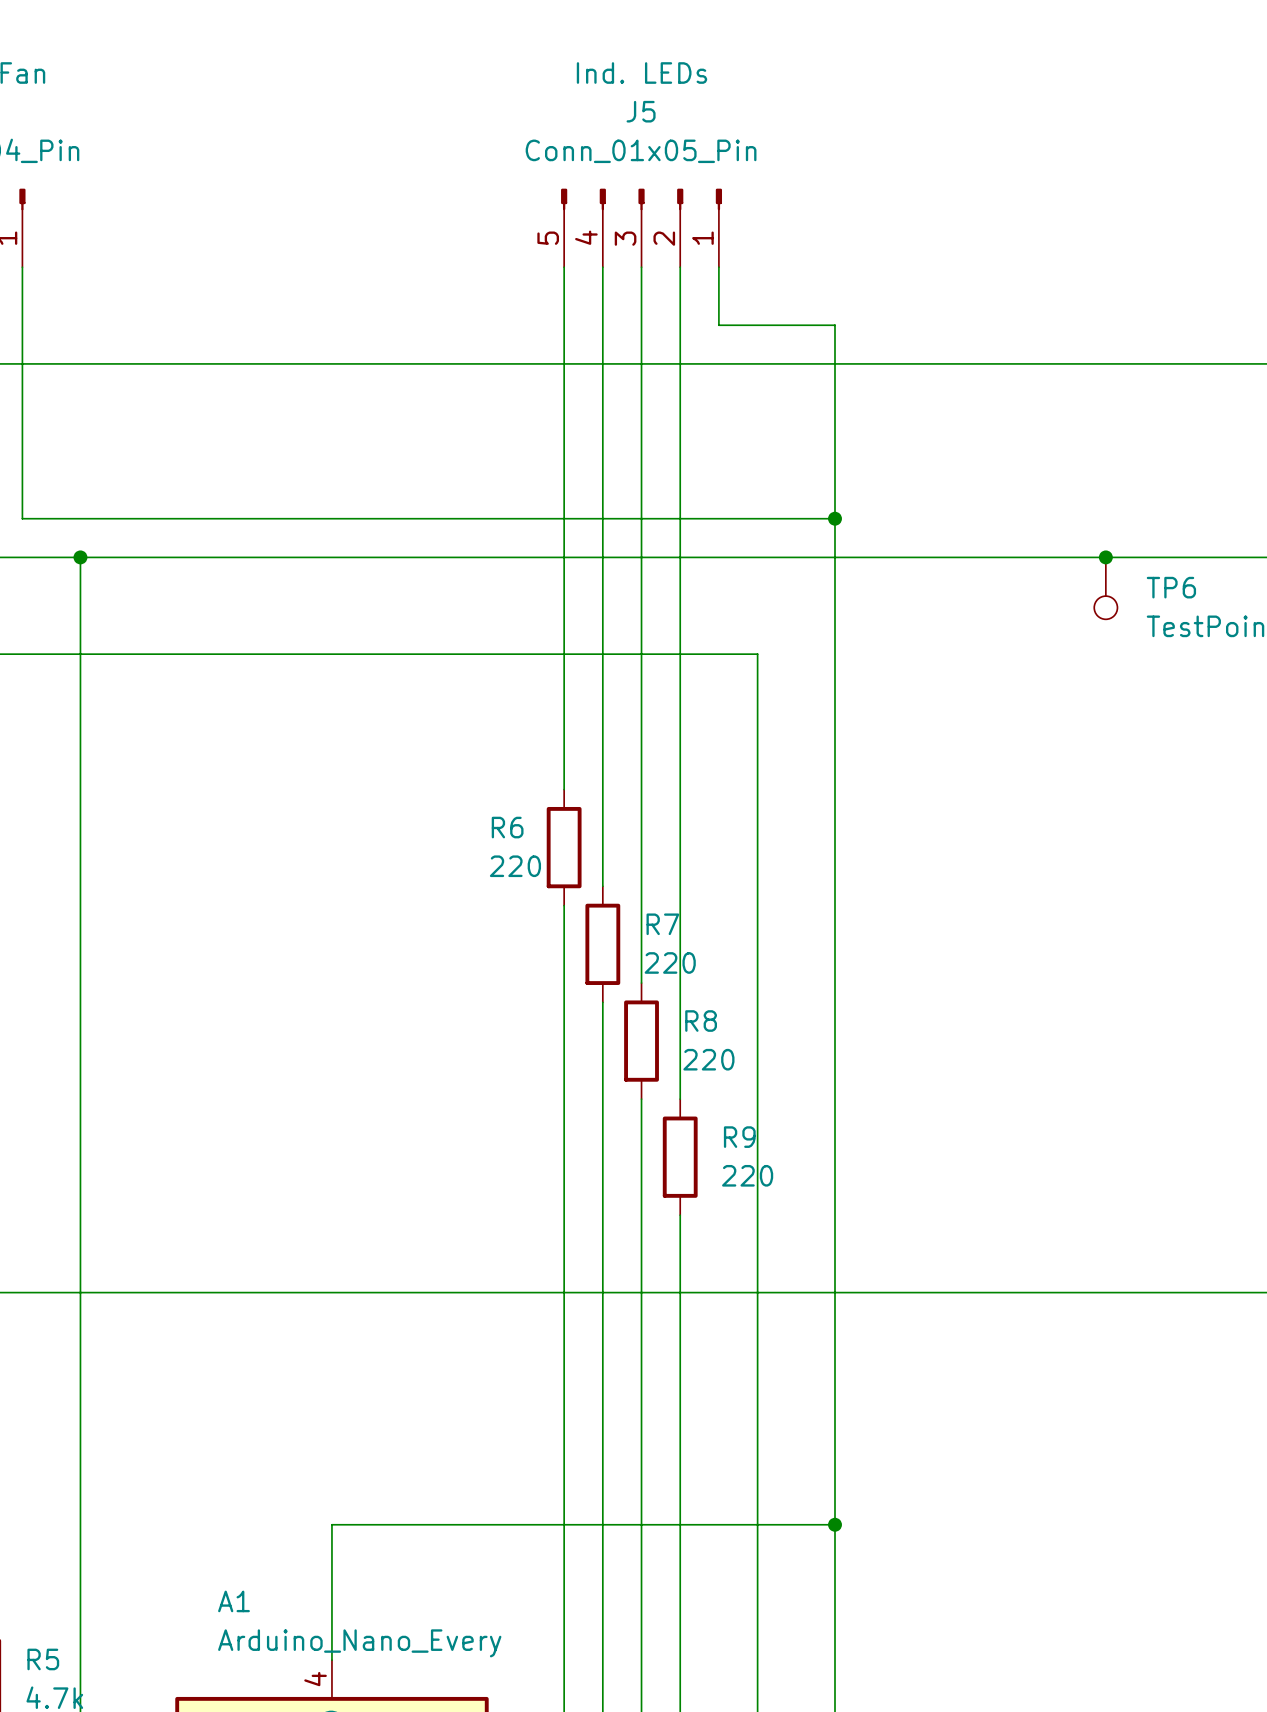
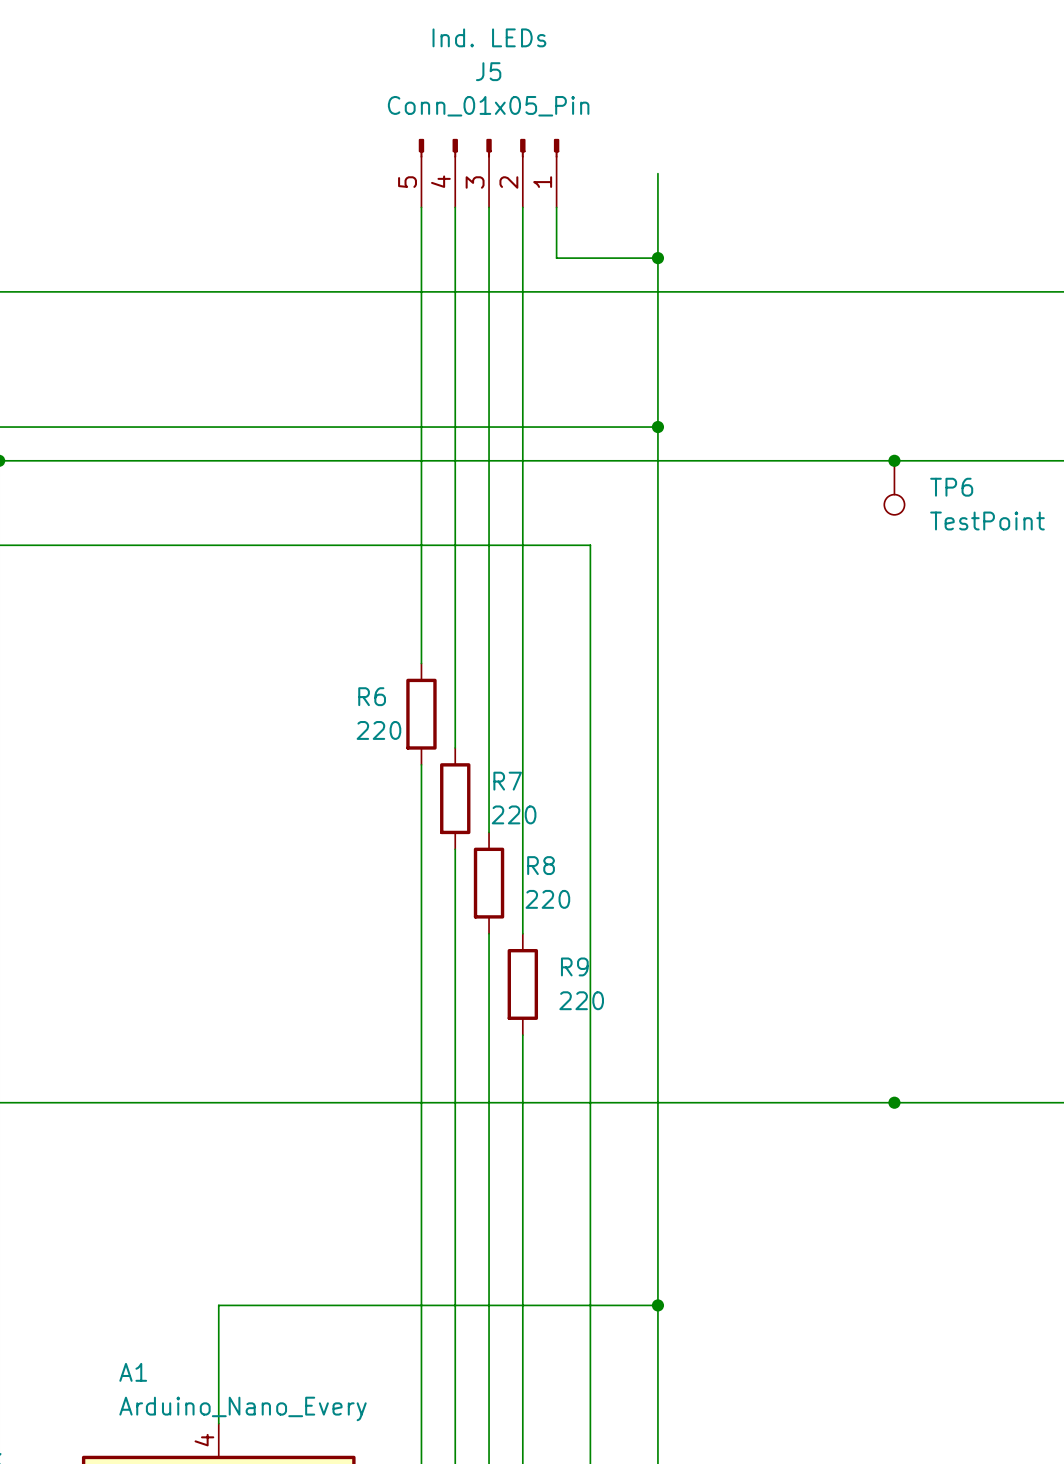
wire: none -> (657, 173) (657, 258)
junction: none -> (657, 258)
junction: none -> (894, 1102)

